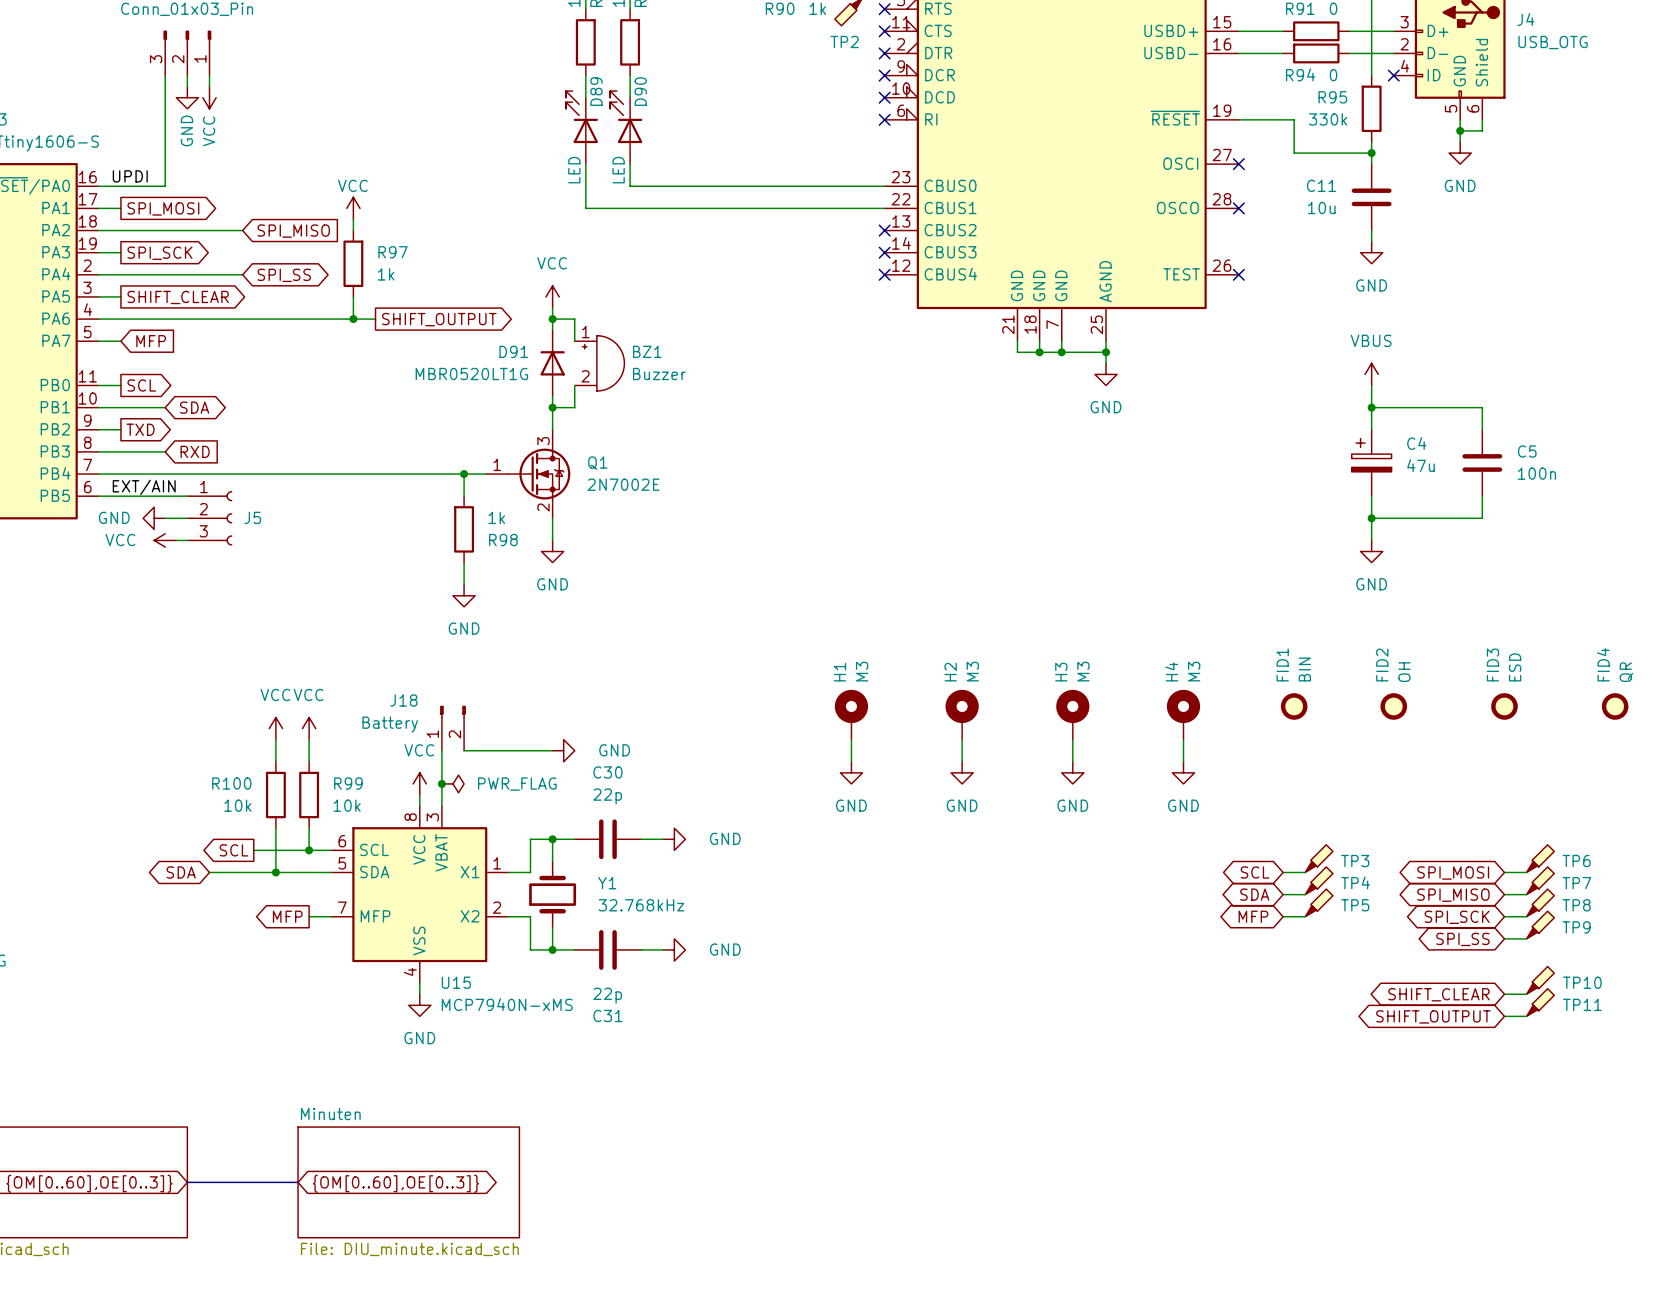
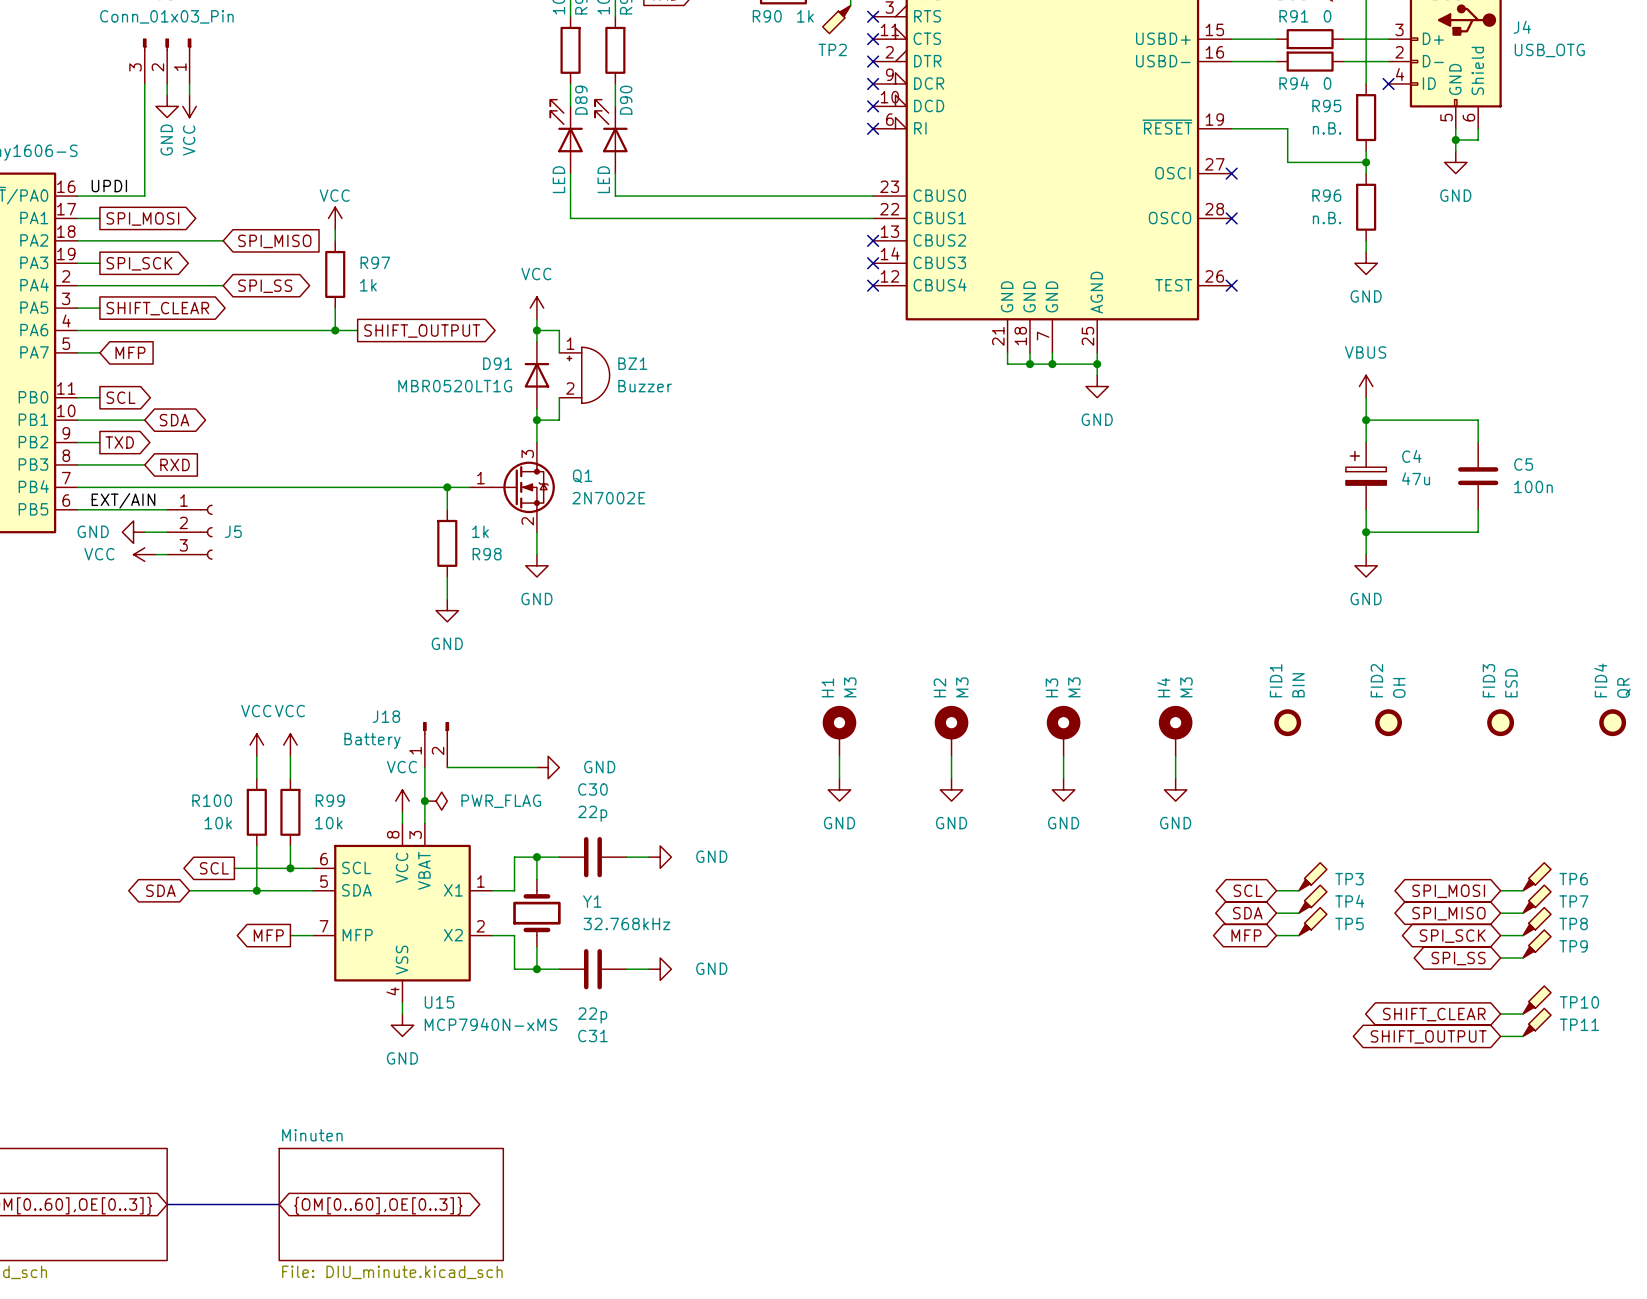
R95 value: 330k (1328, 119) -> n.B. (1327, 128)
C11: 10u (1371, 197) -> none
R96: none -> n.B. (1366, 207)

